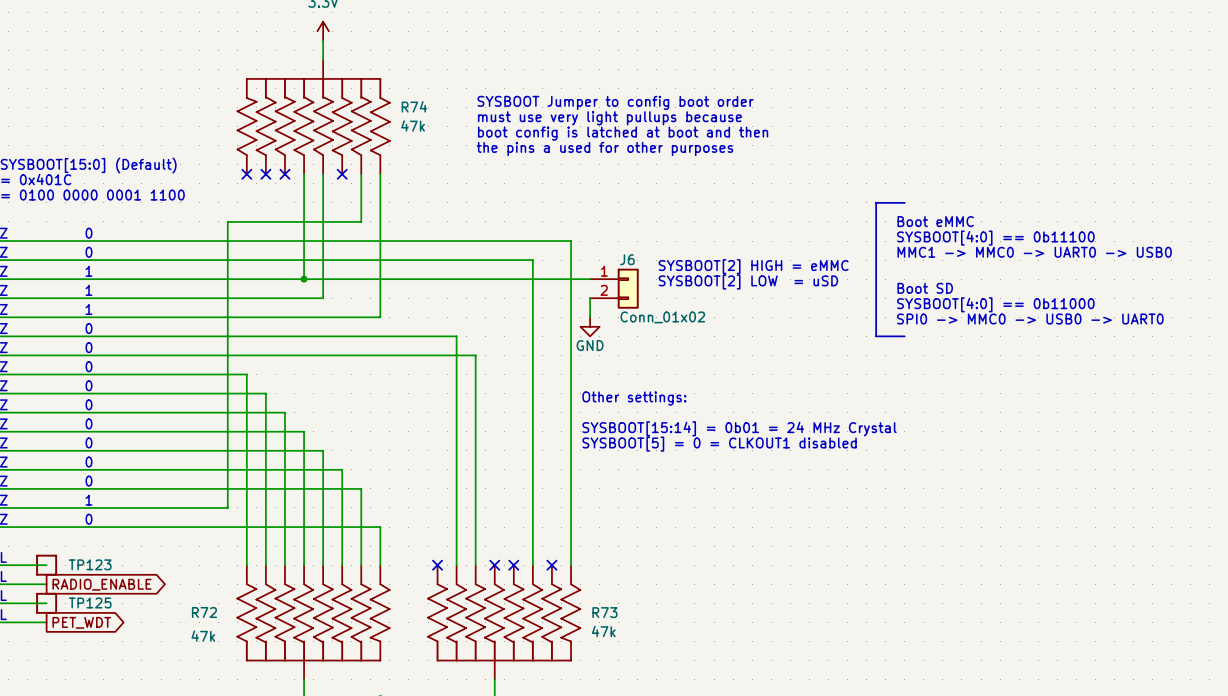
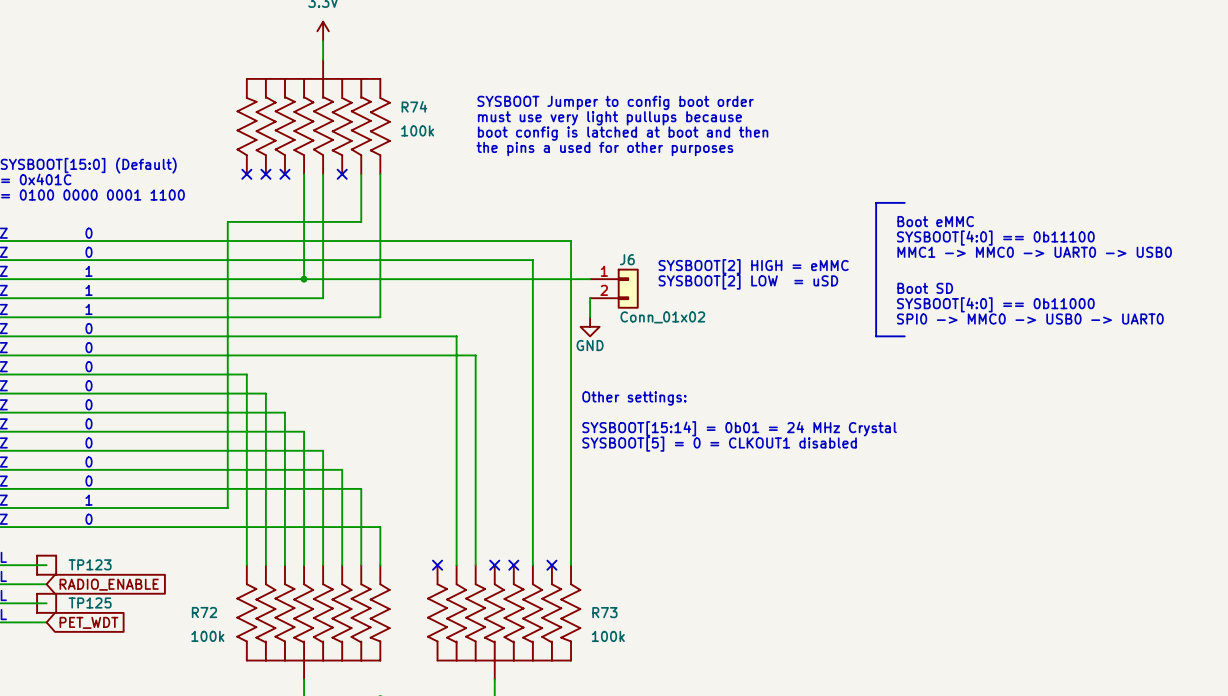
R74 value: 47k (413, 125) -> 100k (417, 130)
global label shape: output (102, 584) -> input (109, 584)
global label shape: output (81, 622) -> input (88, 622)
R73 value: 47k (603, 631) -> 100k (608, 636)
R72 value: 47k (203, 636) -> 100k (207, 636)

